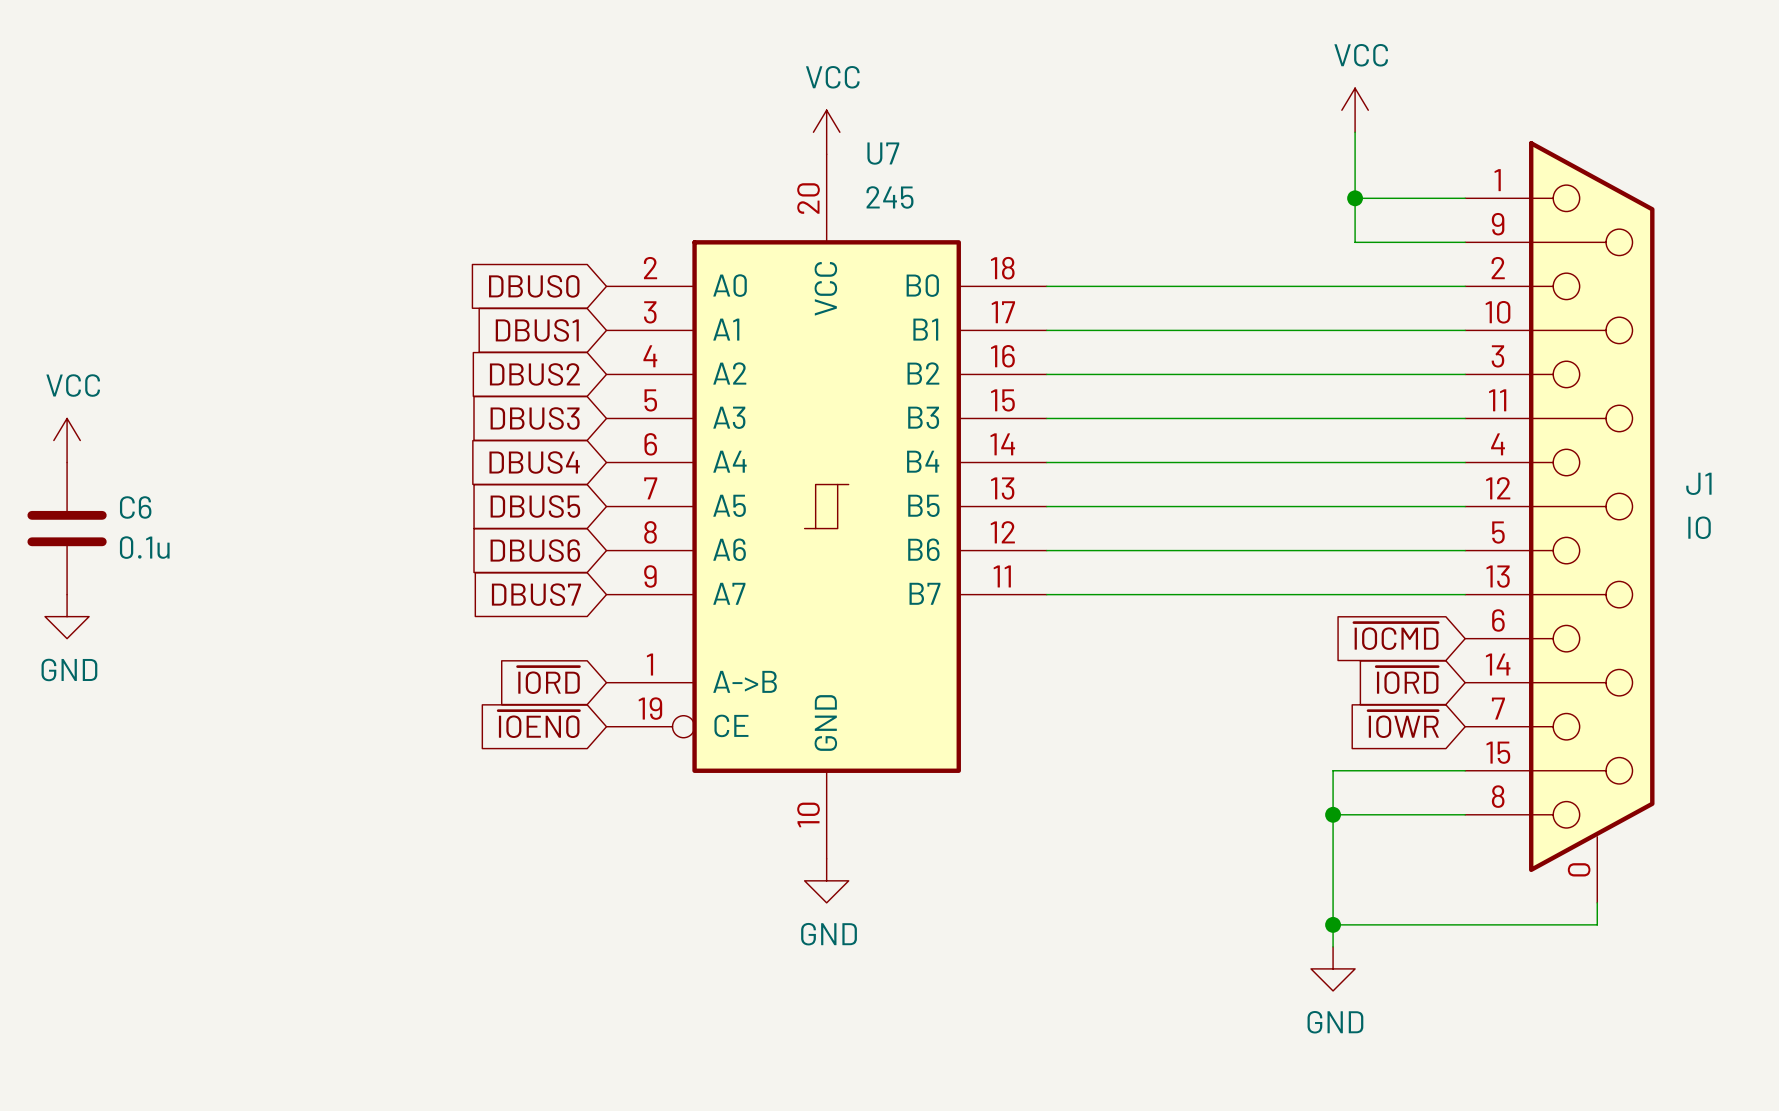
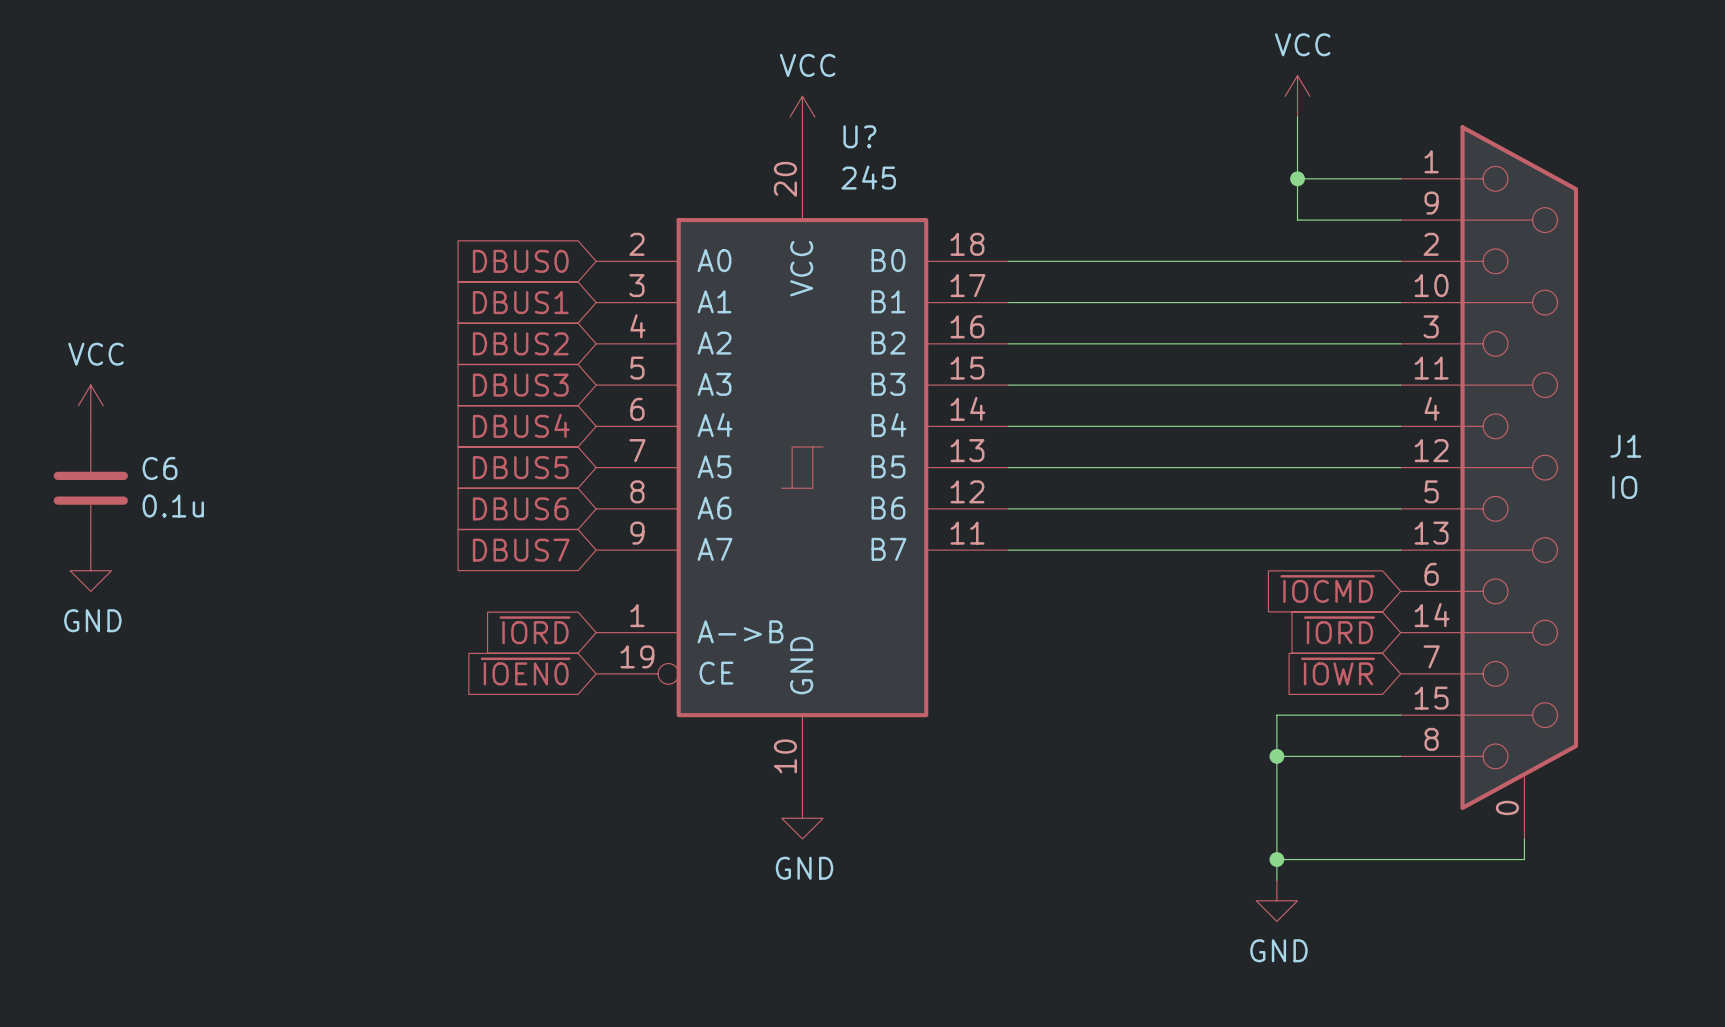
U7 name: U7 (883, 153) -> U? (859, 136)

